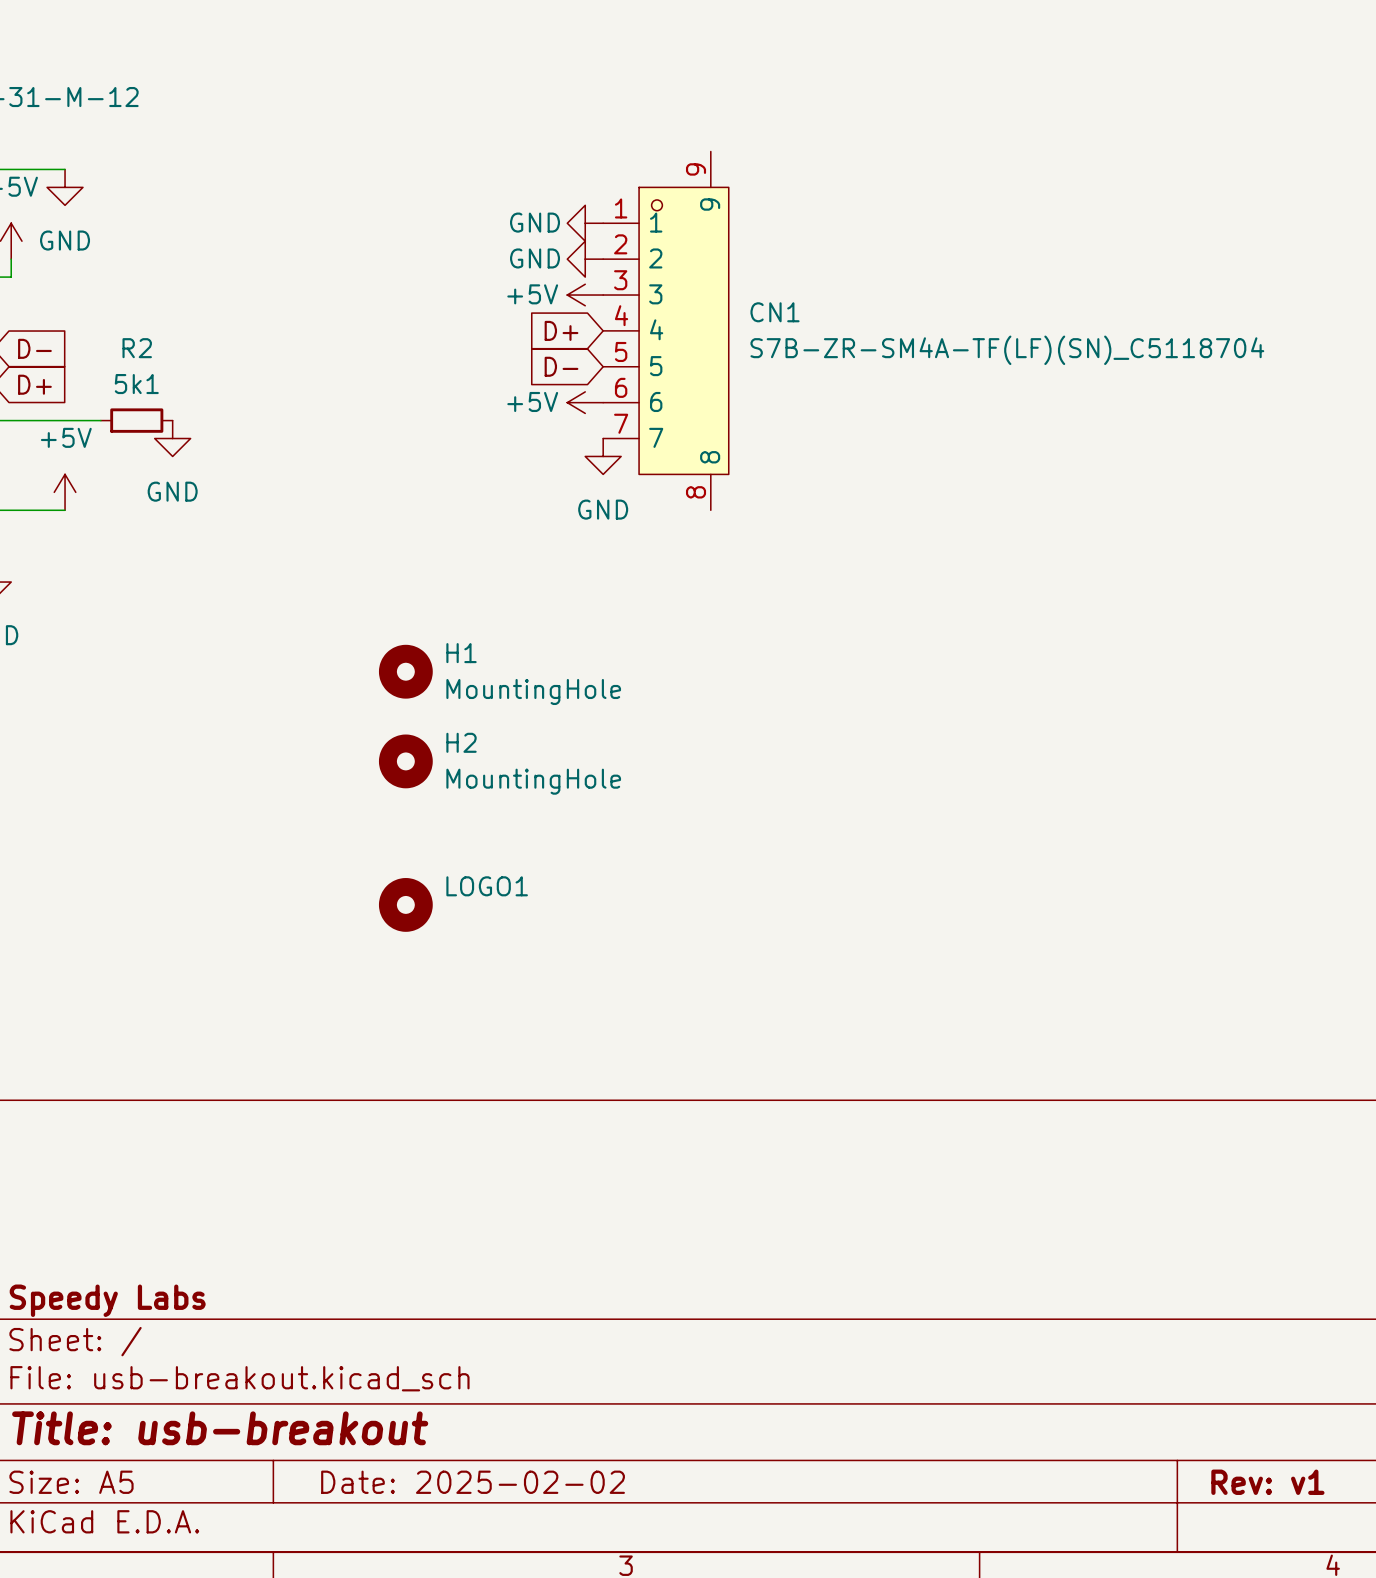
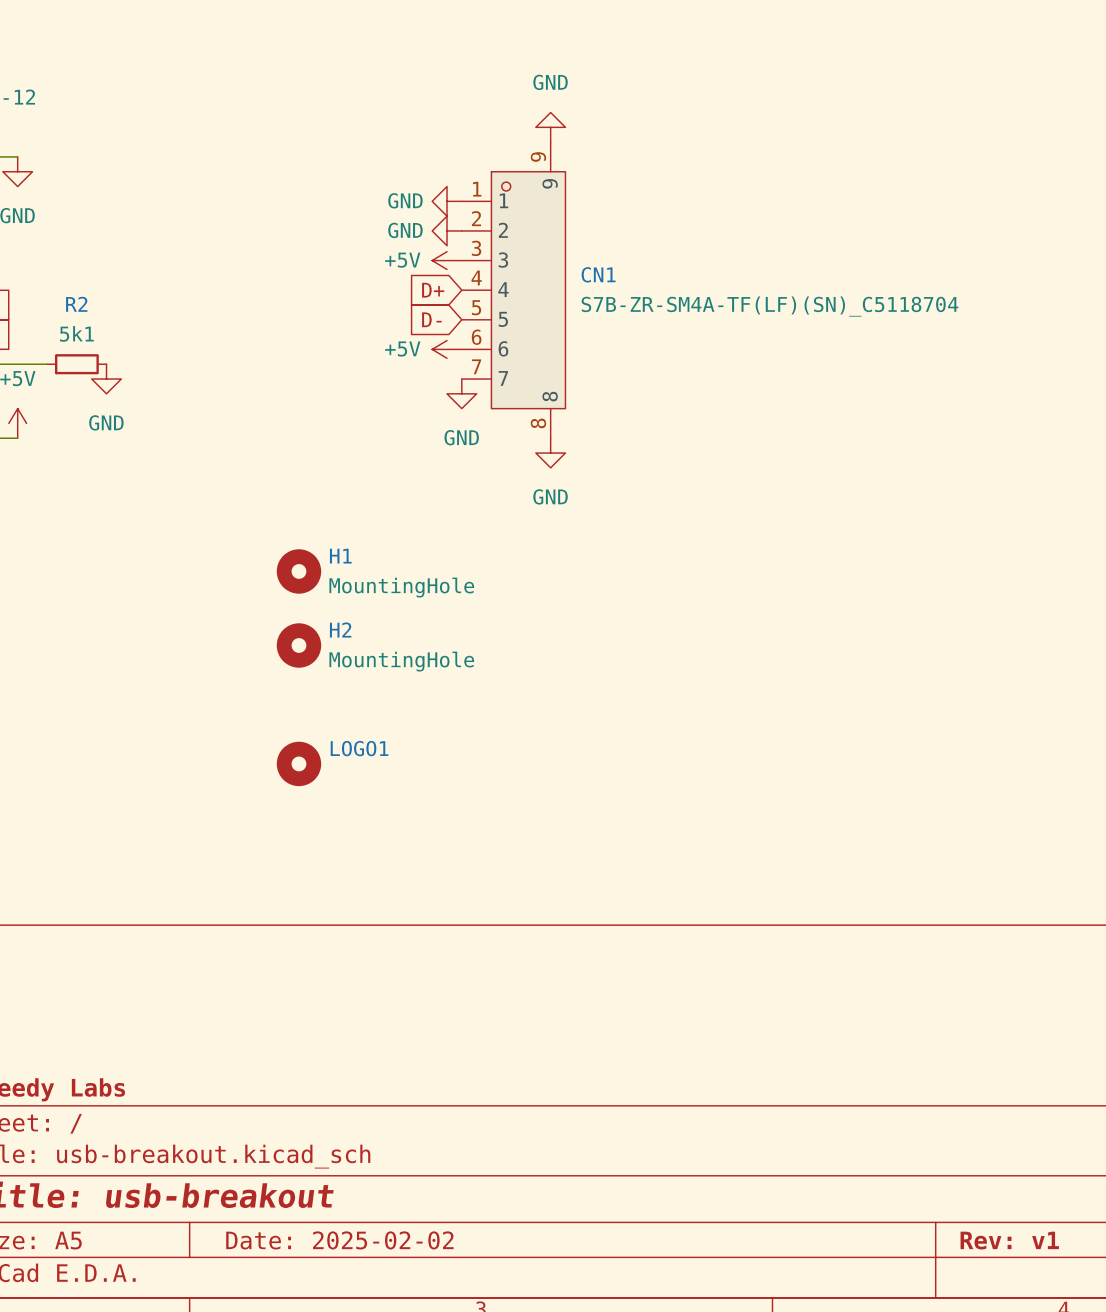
power symbol: none -> GND (550, 127)
power symbol: none -> GND (550, 453)

